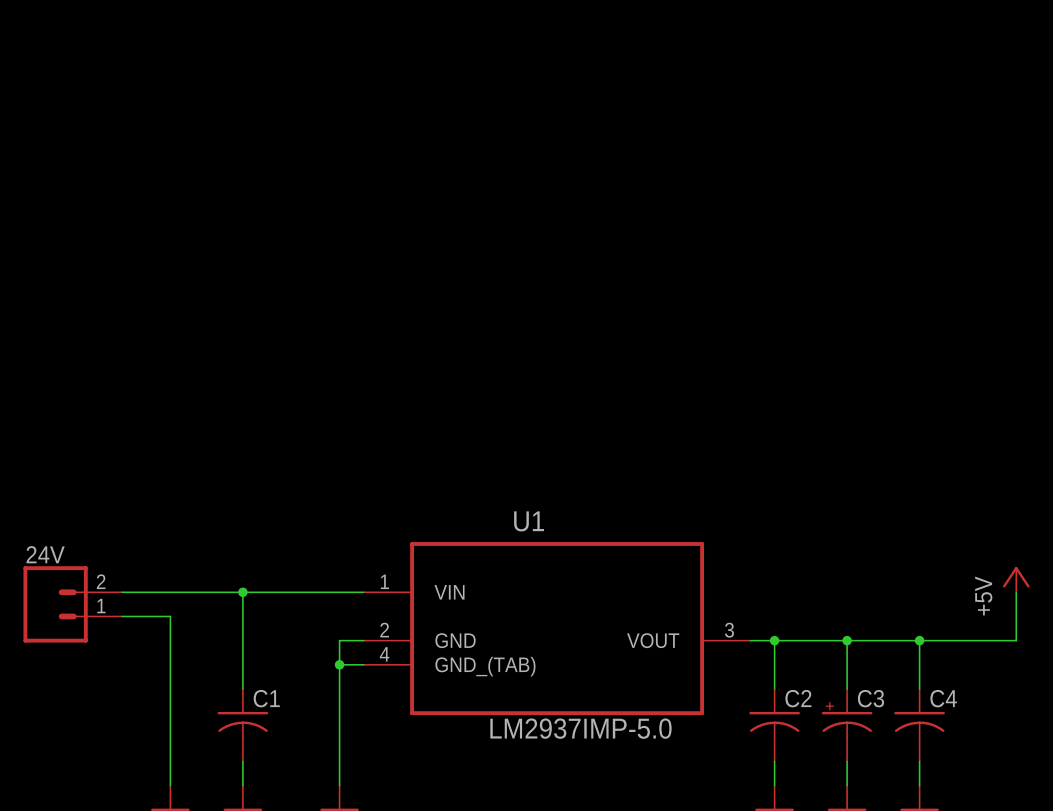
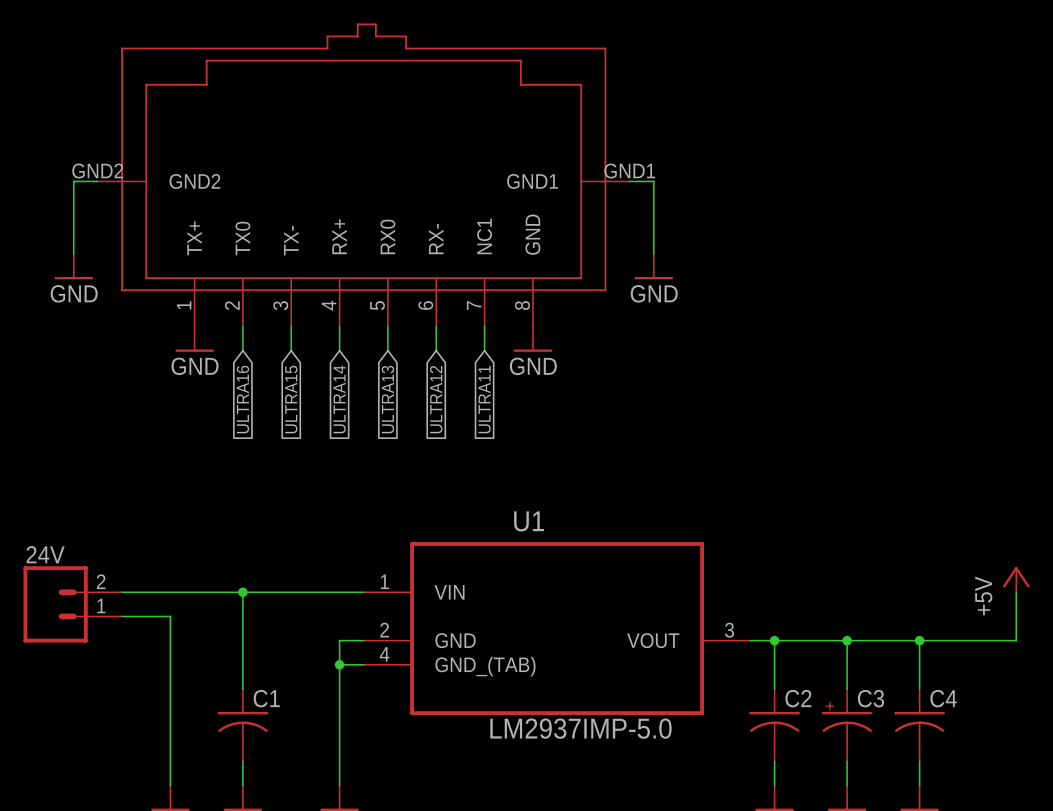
part: none -> (363, 174)
wire: none -> (97, 181) (73, 181) (73, 253)
wire: none -> (629, 181) (653, 181) (653, 253)
power symbol: none -> GND (73, 266)
power symbol: none -> GND (653, 266)
wire: none -> (242, 326) (242, 350)
wire: none -> (291, 326) (291, 350)
wire: none -> (339, 326) (339, 350)
wire: none -> (387, 326) (387, 350)
wire: none -> (436, 326) (436, 350)
wire: none -> (484, 326) (484, 350)
power symbol: none -> GND (194, 339)
power symbol: none -> GND (532, 339)
global label: none -> ULTRA16 (242, 399)
global label: none -> ULTRA15 (291, 399)
global label: none -> ULTRA14 (339, 399)
global label: none -> ULTRA13 (387, 399)
global label: none -> ULTRA12 (436, 399)
global label: none -> ULTRA11 (484, 399)

